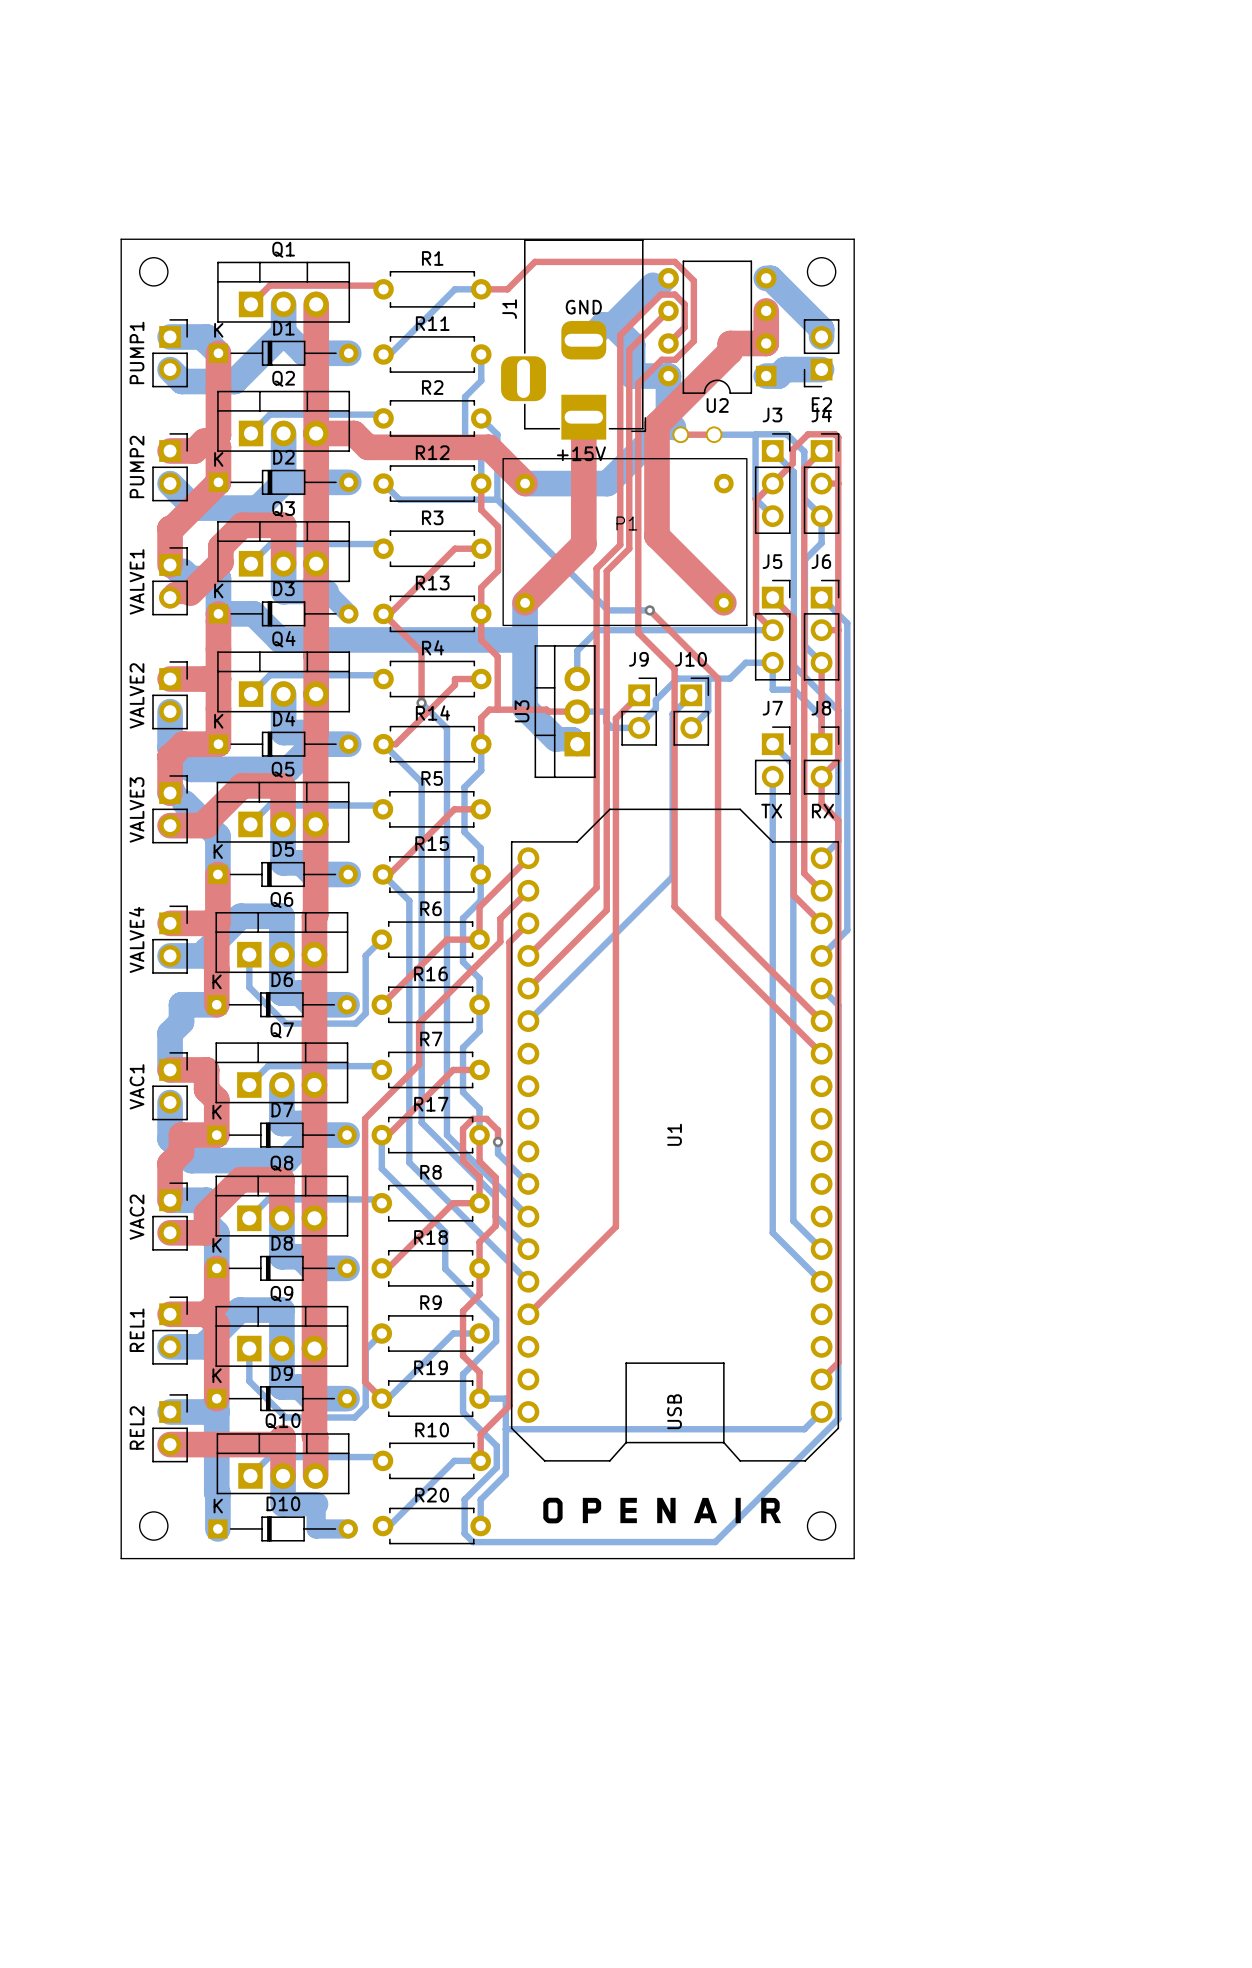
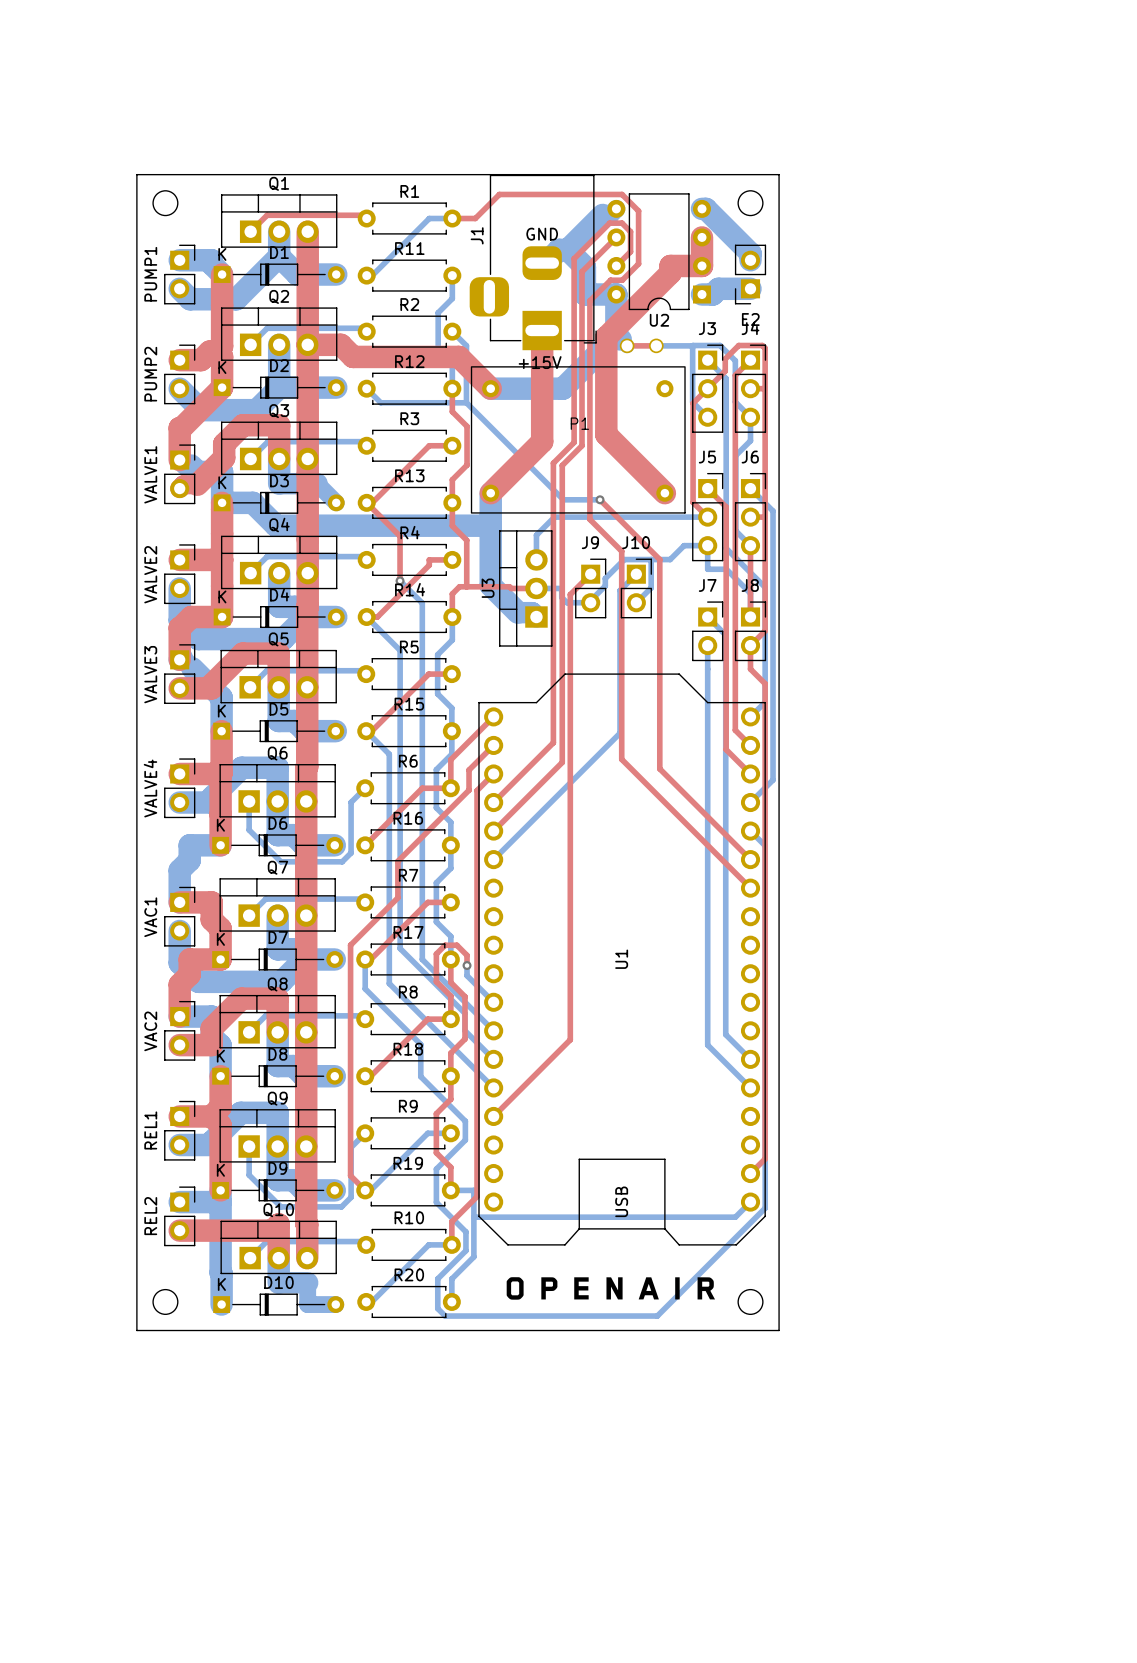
text: TX (771, 811) -> none
text: RX (822, 811) -> none

